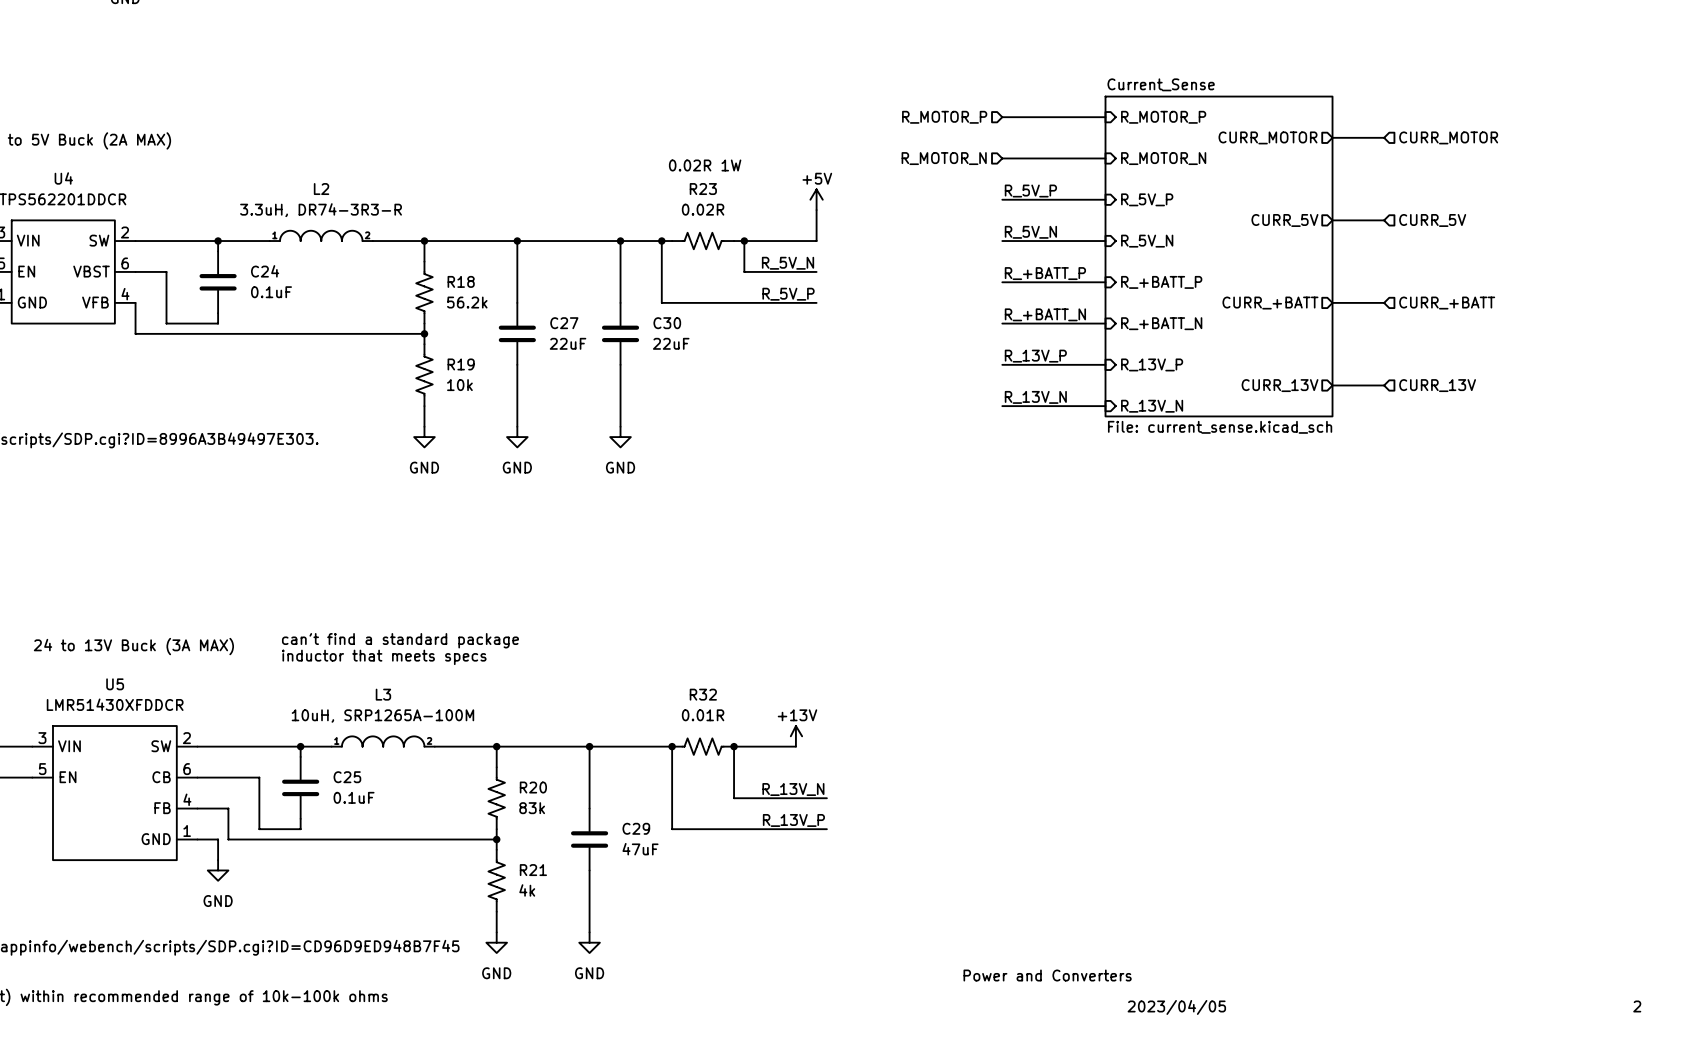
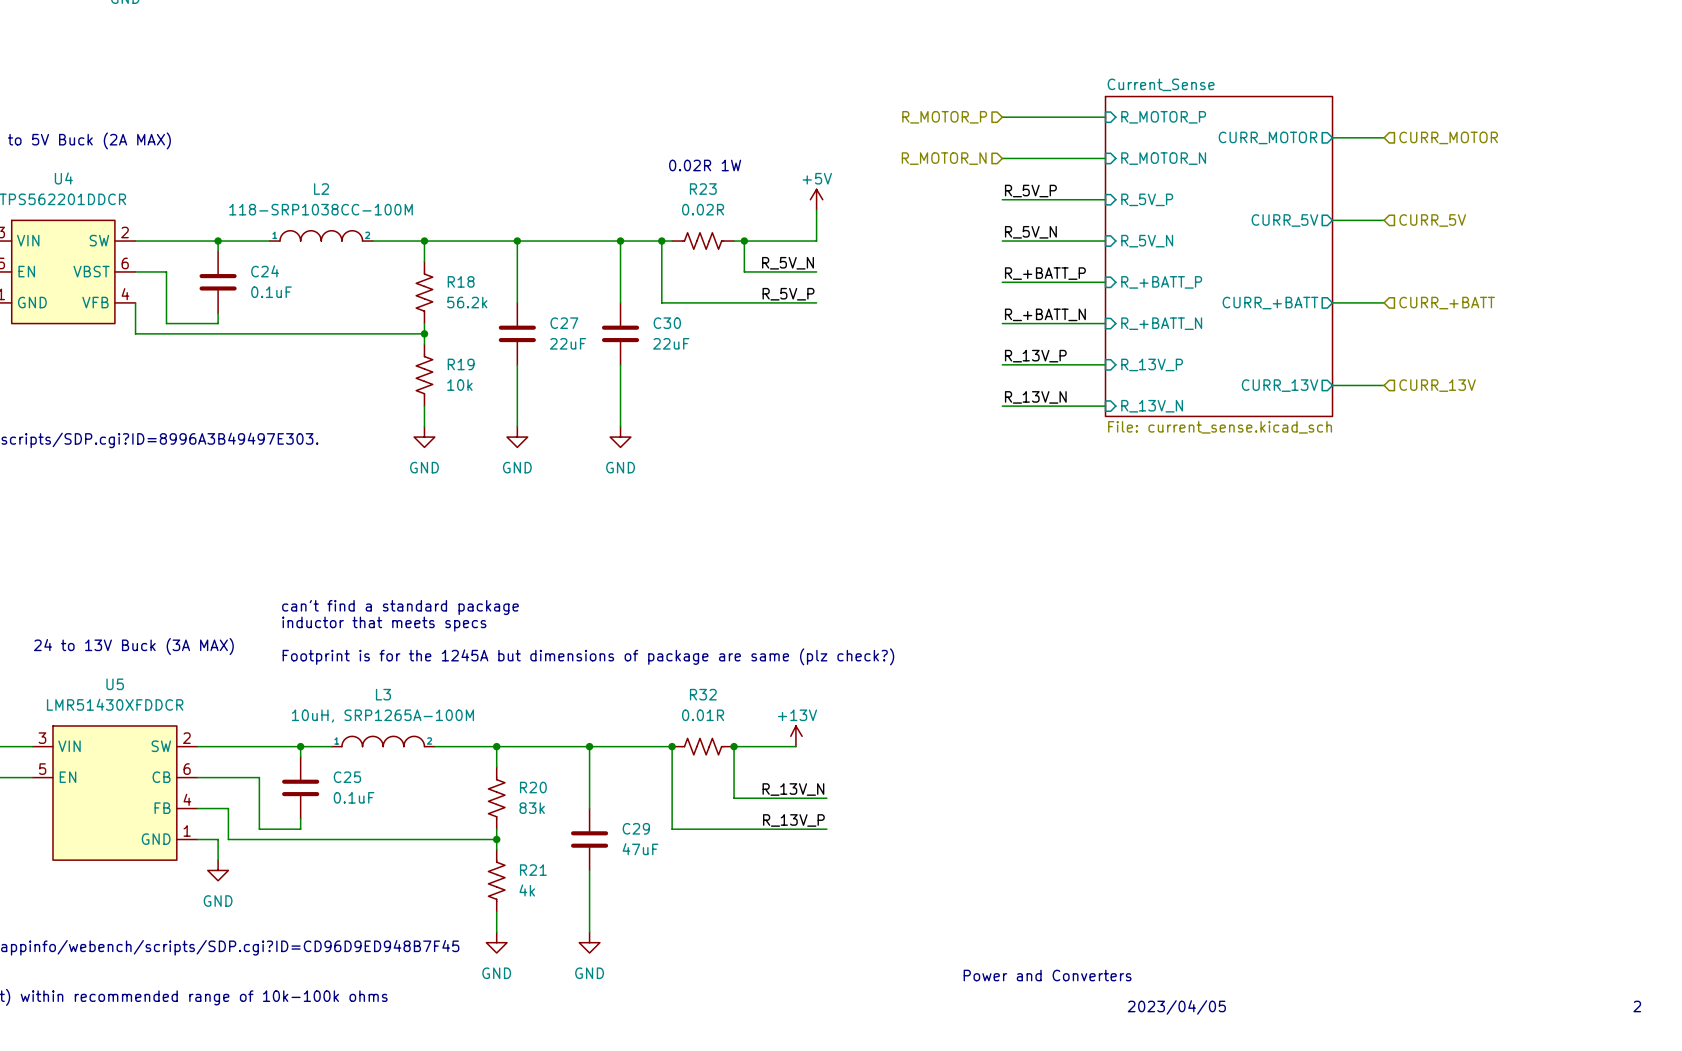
L2 value: 3.3uH, DR74-3R3-R (321, 210) -> 118-SRP1038CC-100M (321, 209)
text: none -> inductor that meets specs (384, 624)
text position: can't find a standard package (400, 640) -> can't find a standard package (400, 607)
text: inductor that meets specs (384, 657) -> Footprint is for the 1245A but dimensions of package are same (plz check?) (588, 656)

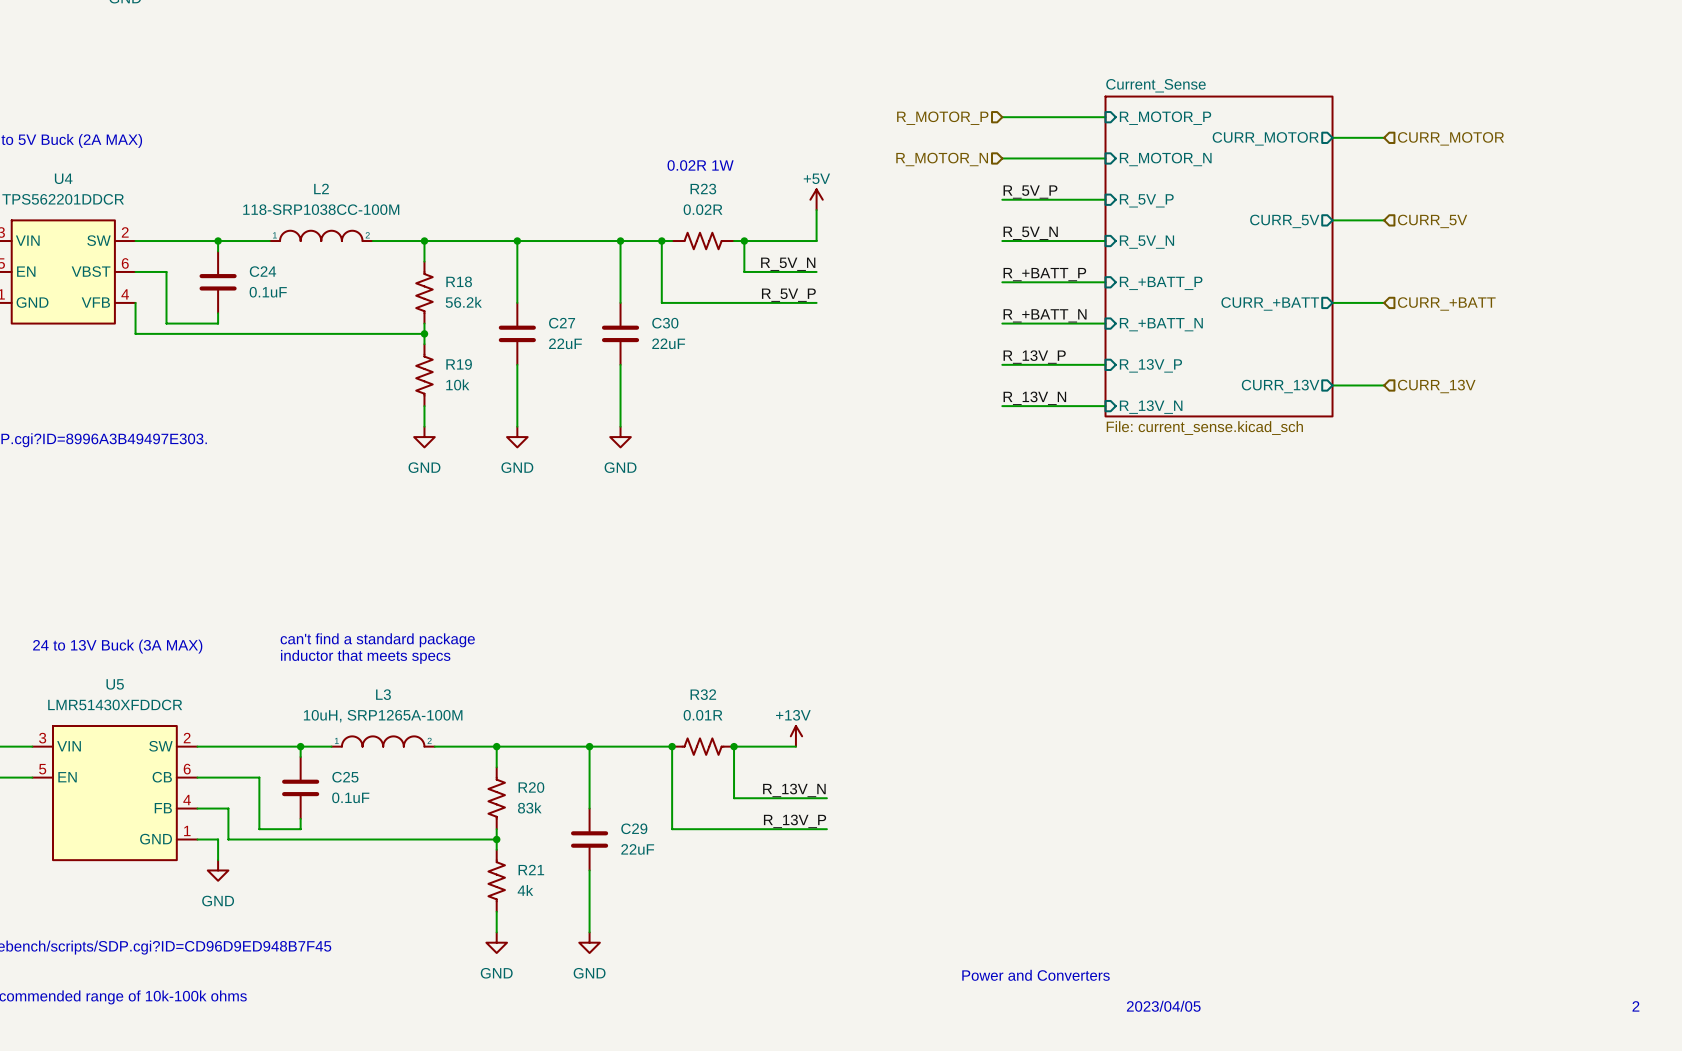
text position: can't find a standard package (400, 607) -> can't find a standard package (377, 640)
text: inductor that meets specs (384, 624) -> none
text: Footprint is for the 1245A but dimensions of package are same (plz check?) (588, 656) -> inductor that meets specs (365, 656)
C29 value: 47uF (640, 849) -> 22uF (637, 849)

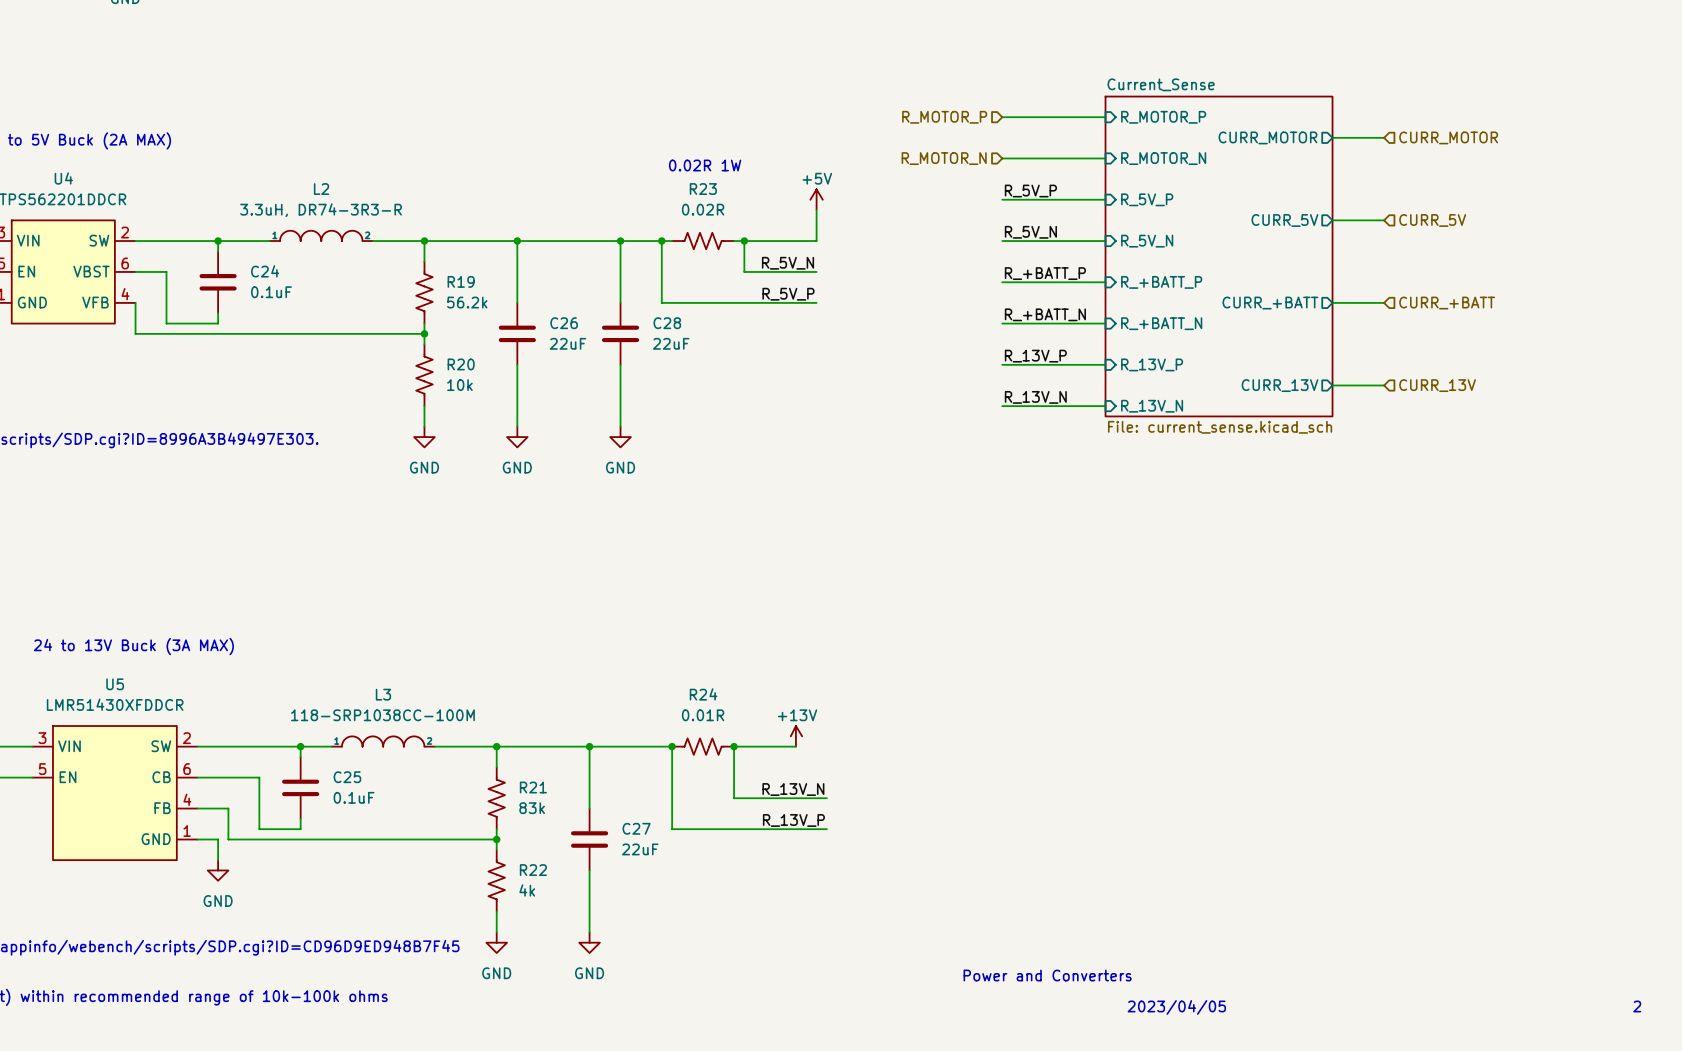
L2 value: 118-SRP1038CC-100M (321, 209) -> 3.3uH, DR74-3R3-R (321, 210)
R18 name: R18 (459, 281) -> R19 (461, 281)
C27 name: C27 (562, 323) -> C26 (564, 323)
C30 name: C30 (665, 323) -> C28 (667, 323)
R19 name: R19 (459, 364) -> R20 (461, 364)
text: can't find a standard package (377, 640) -> none
text: inductor that meets specs (365, 656) -> none
R32 name: R32 (703, 694) -> R24 (703, 694)
L3 value: 10uH, SRP1265A-100M (383, 716) -> 118-SRP1038CC-100M (382, 715)
R20 name: R20 (531, 787) -> R21 (533, 787)
C29 name: C29 (634, 828) -> C27 (636, 828)
R21 name: R21 (531, 870) -> R22 (533, 870)

